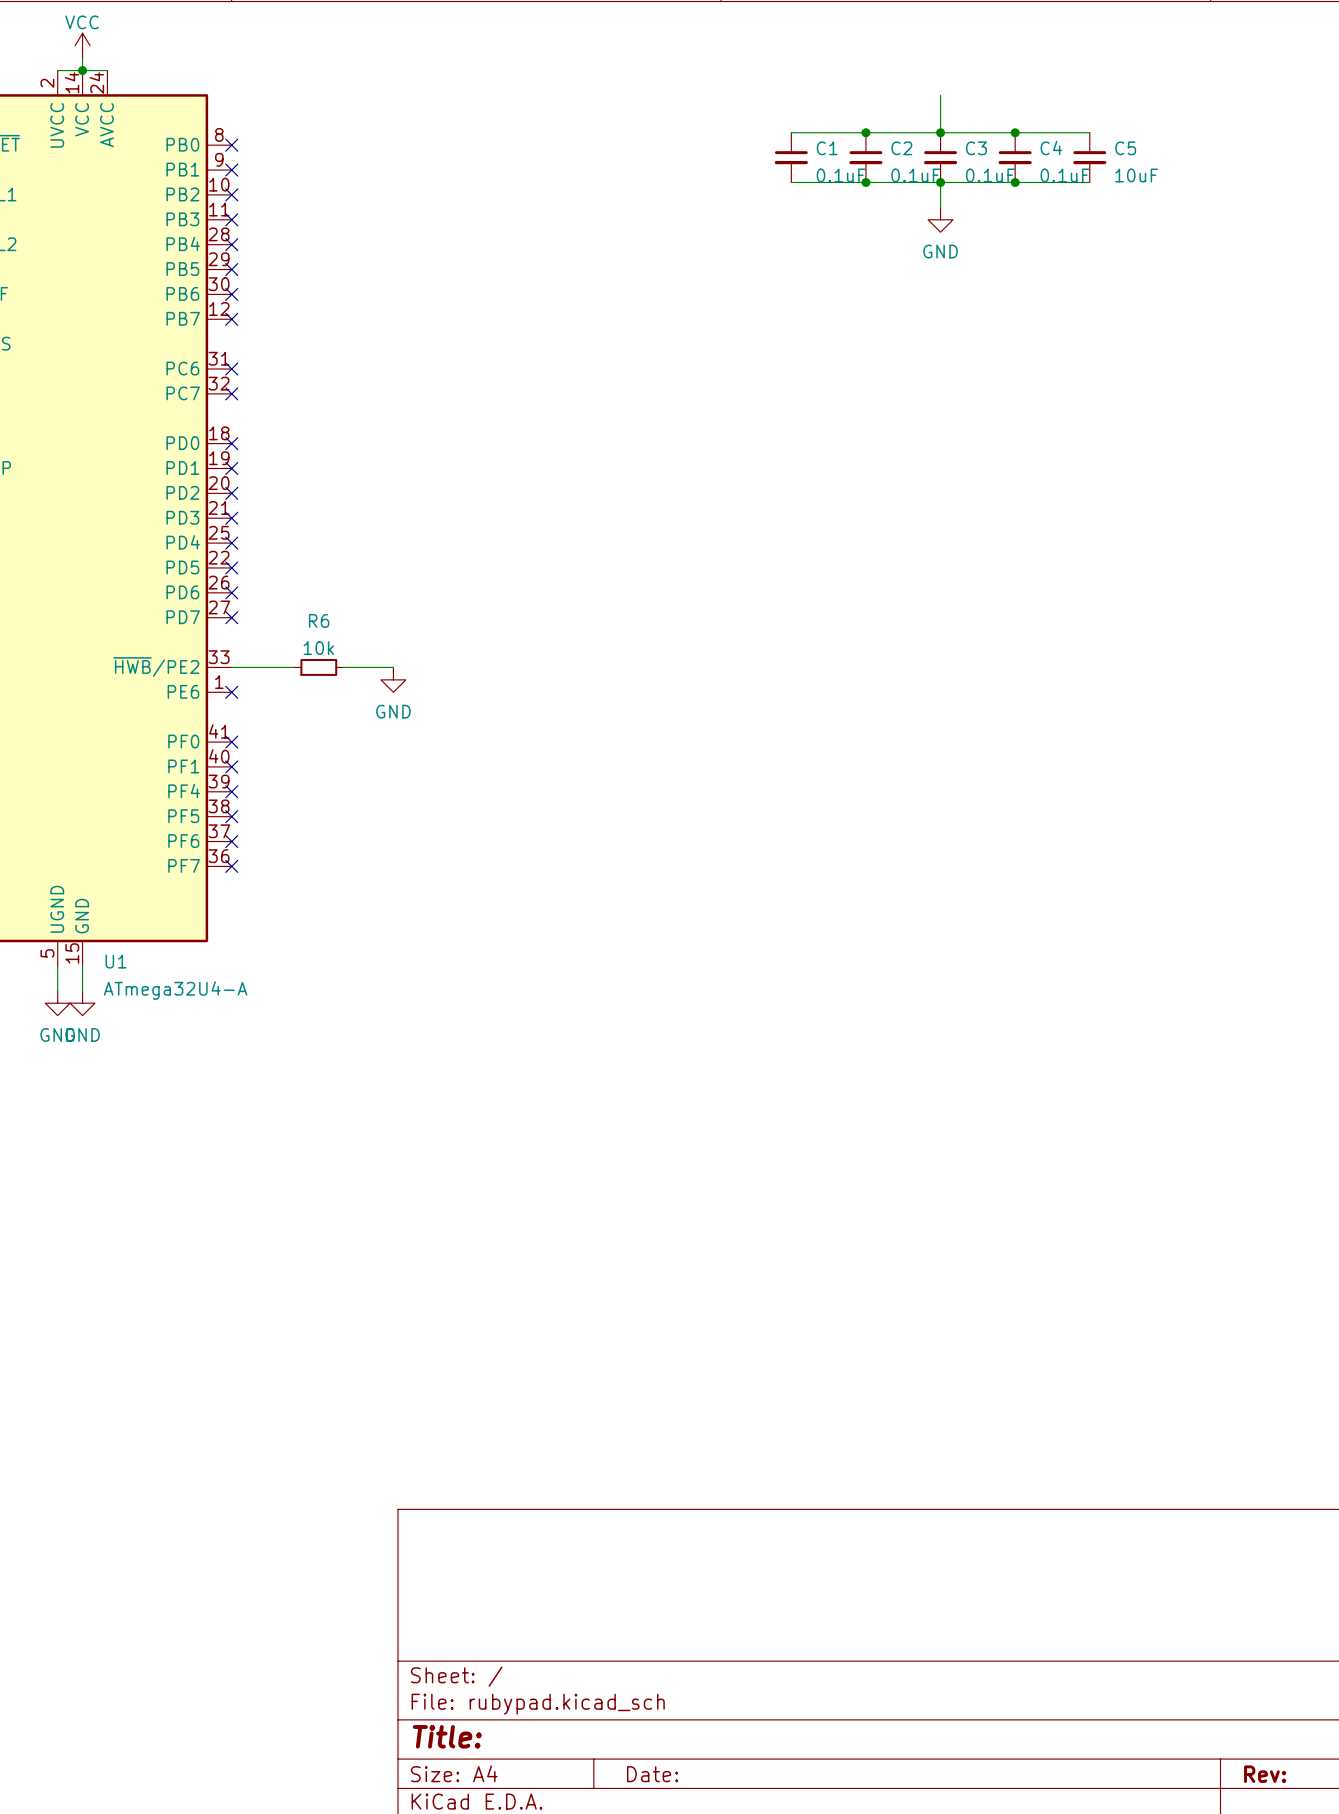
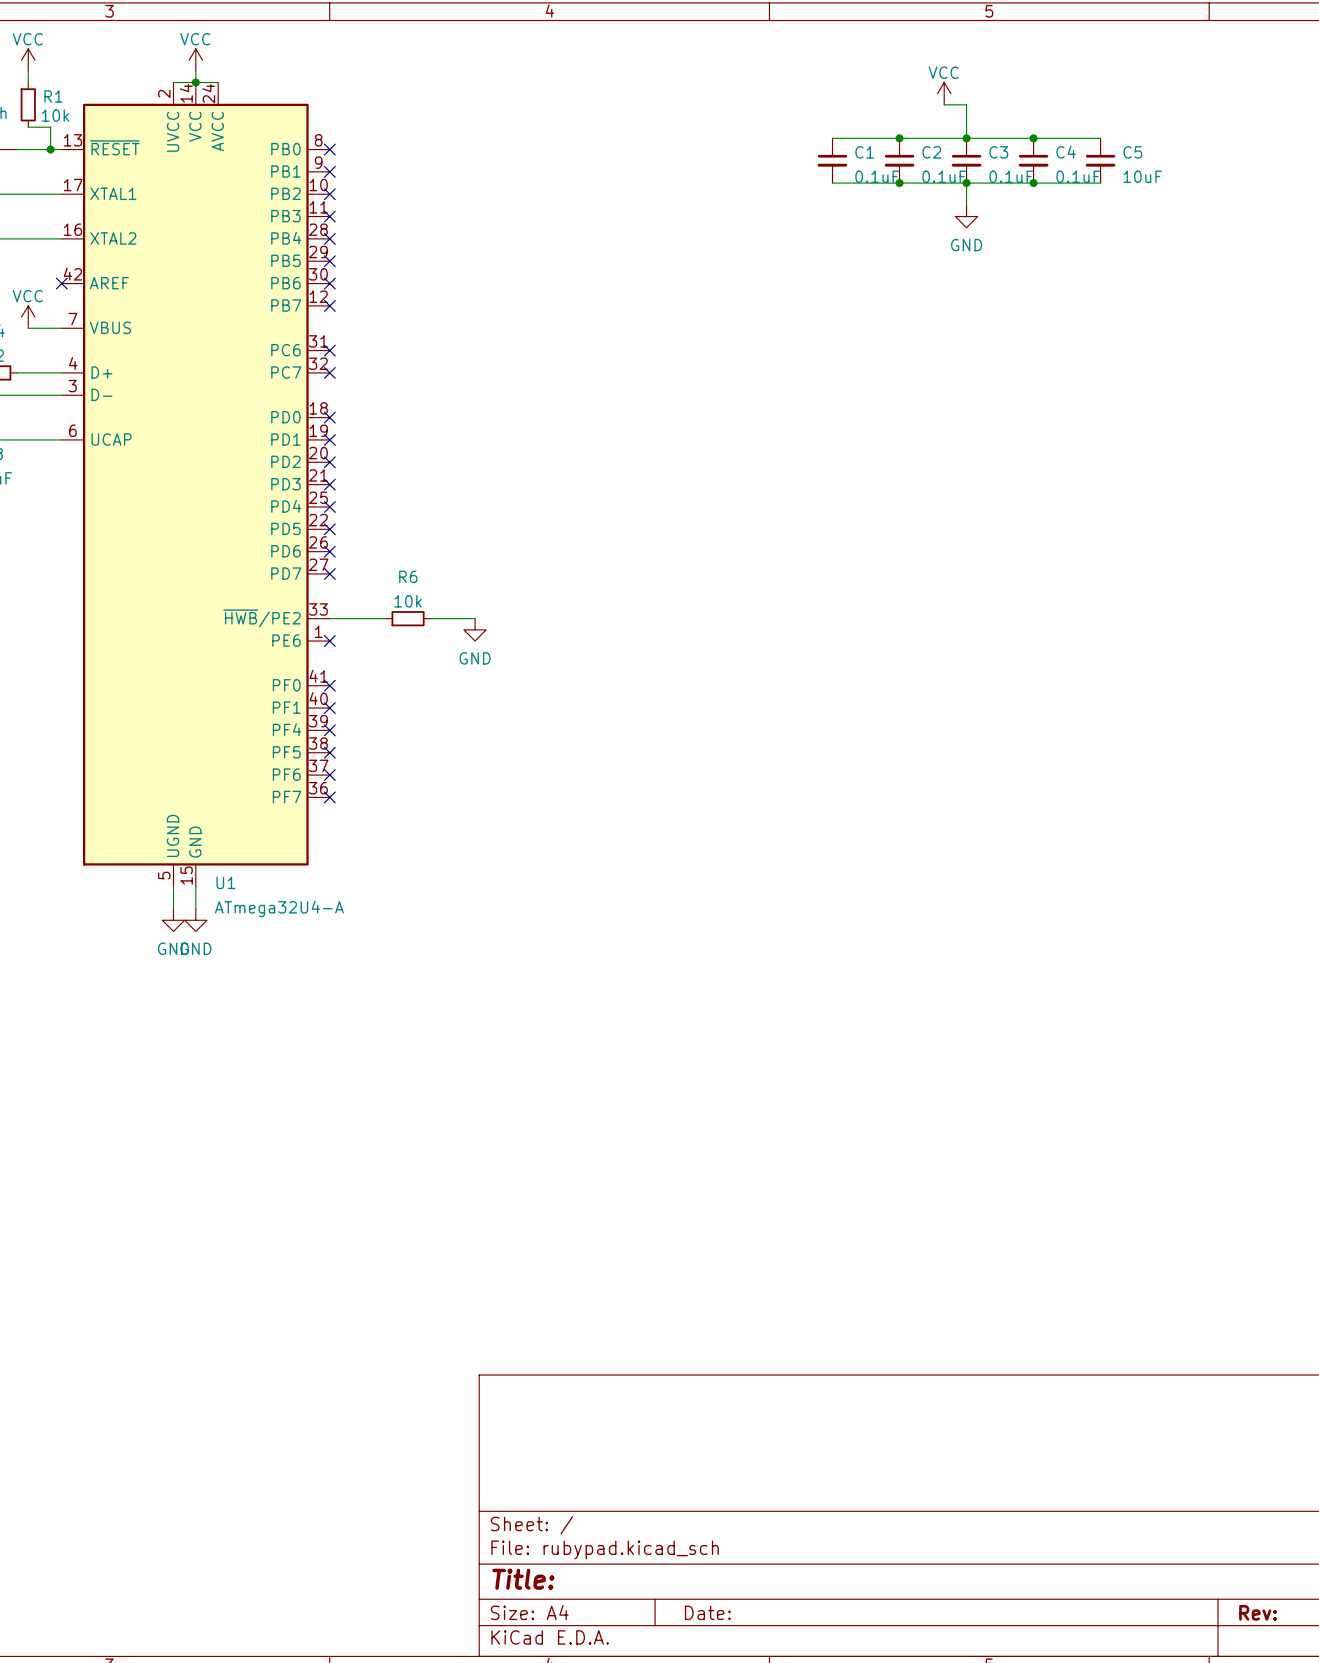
power symbol: none -> VCC (944, 93)
wire: none -> (944, 104) (966, 104)

